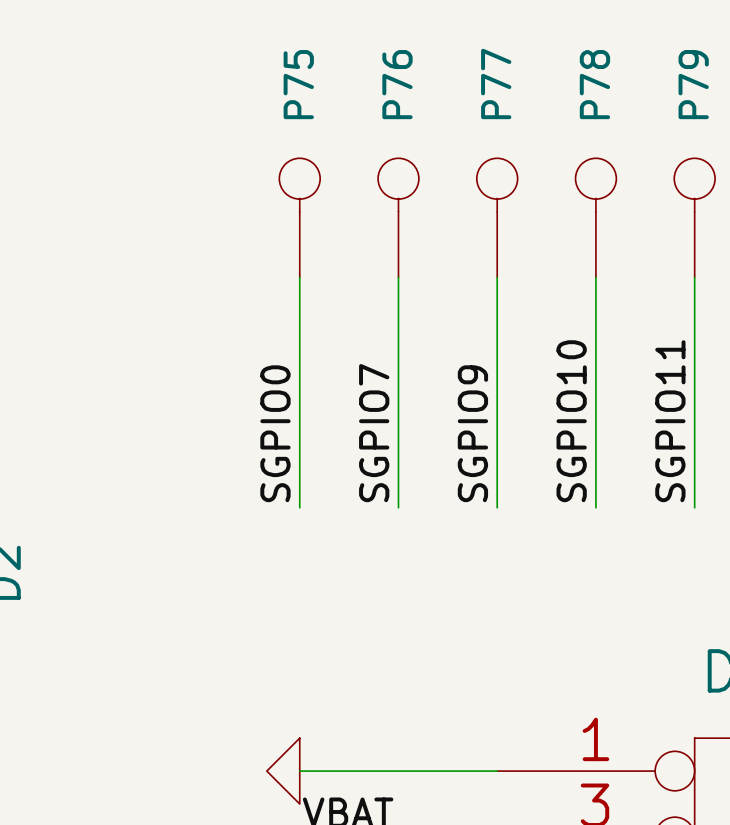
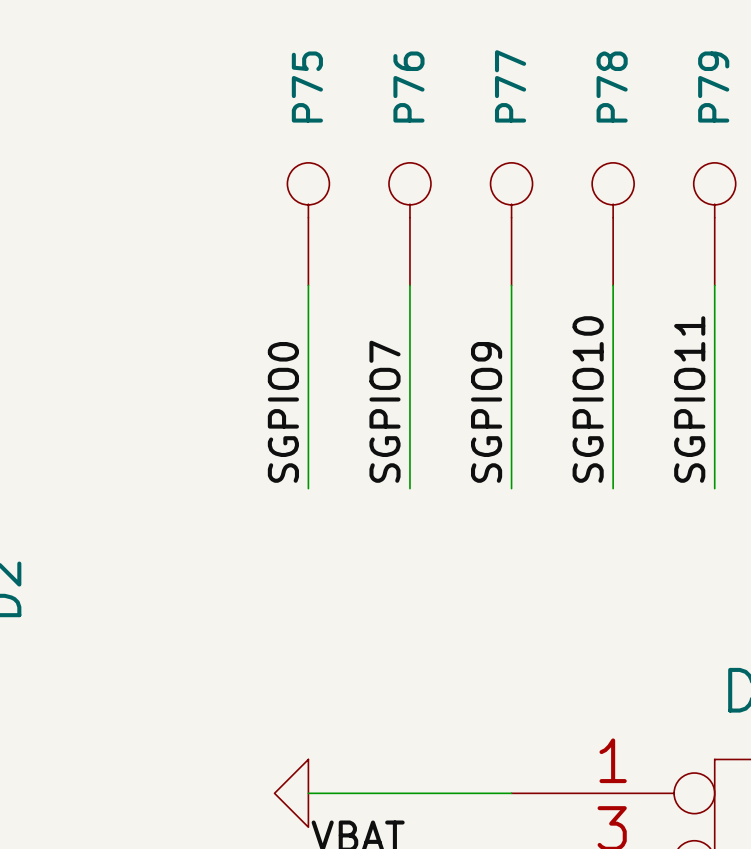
label position: SGPIO10 (571, 421) -> SGPIO10 (588, 399)
label position: SGPIO11 (670, 421) -> SGPIO11 (689, 399)
label position: SGPIO0 (275, 433) -> SGPIO0 (283, 412)
label position: SGPIO7 (374, 433) -> SGPIO7 (384, 411)
label position: SGPIO9 (472, 433) -> SGPIO9 (486, 412)
wire: (299, 474) (299, 507) -> none
wire: (398, 474) (398, 507) -> none
wire: (497, 474) (497, 507) -> none
wire: (595, 474) (595, 507) -> none
wire: (694, 474) (694, 507) -> none

